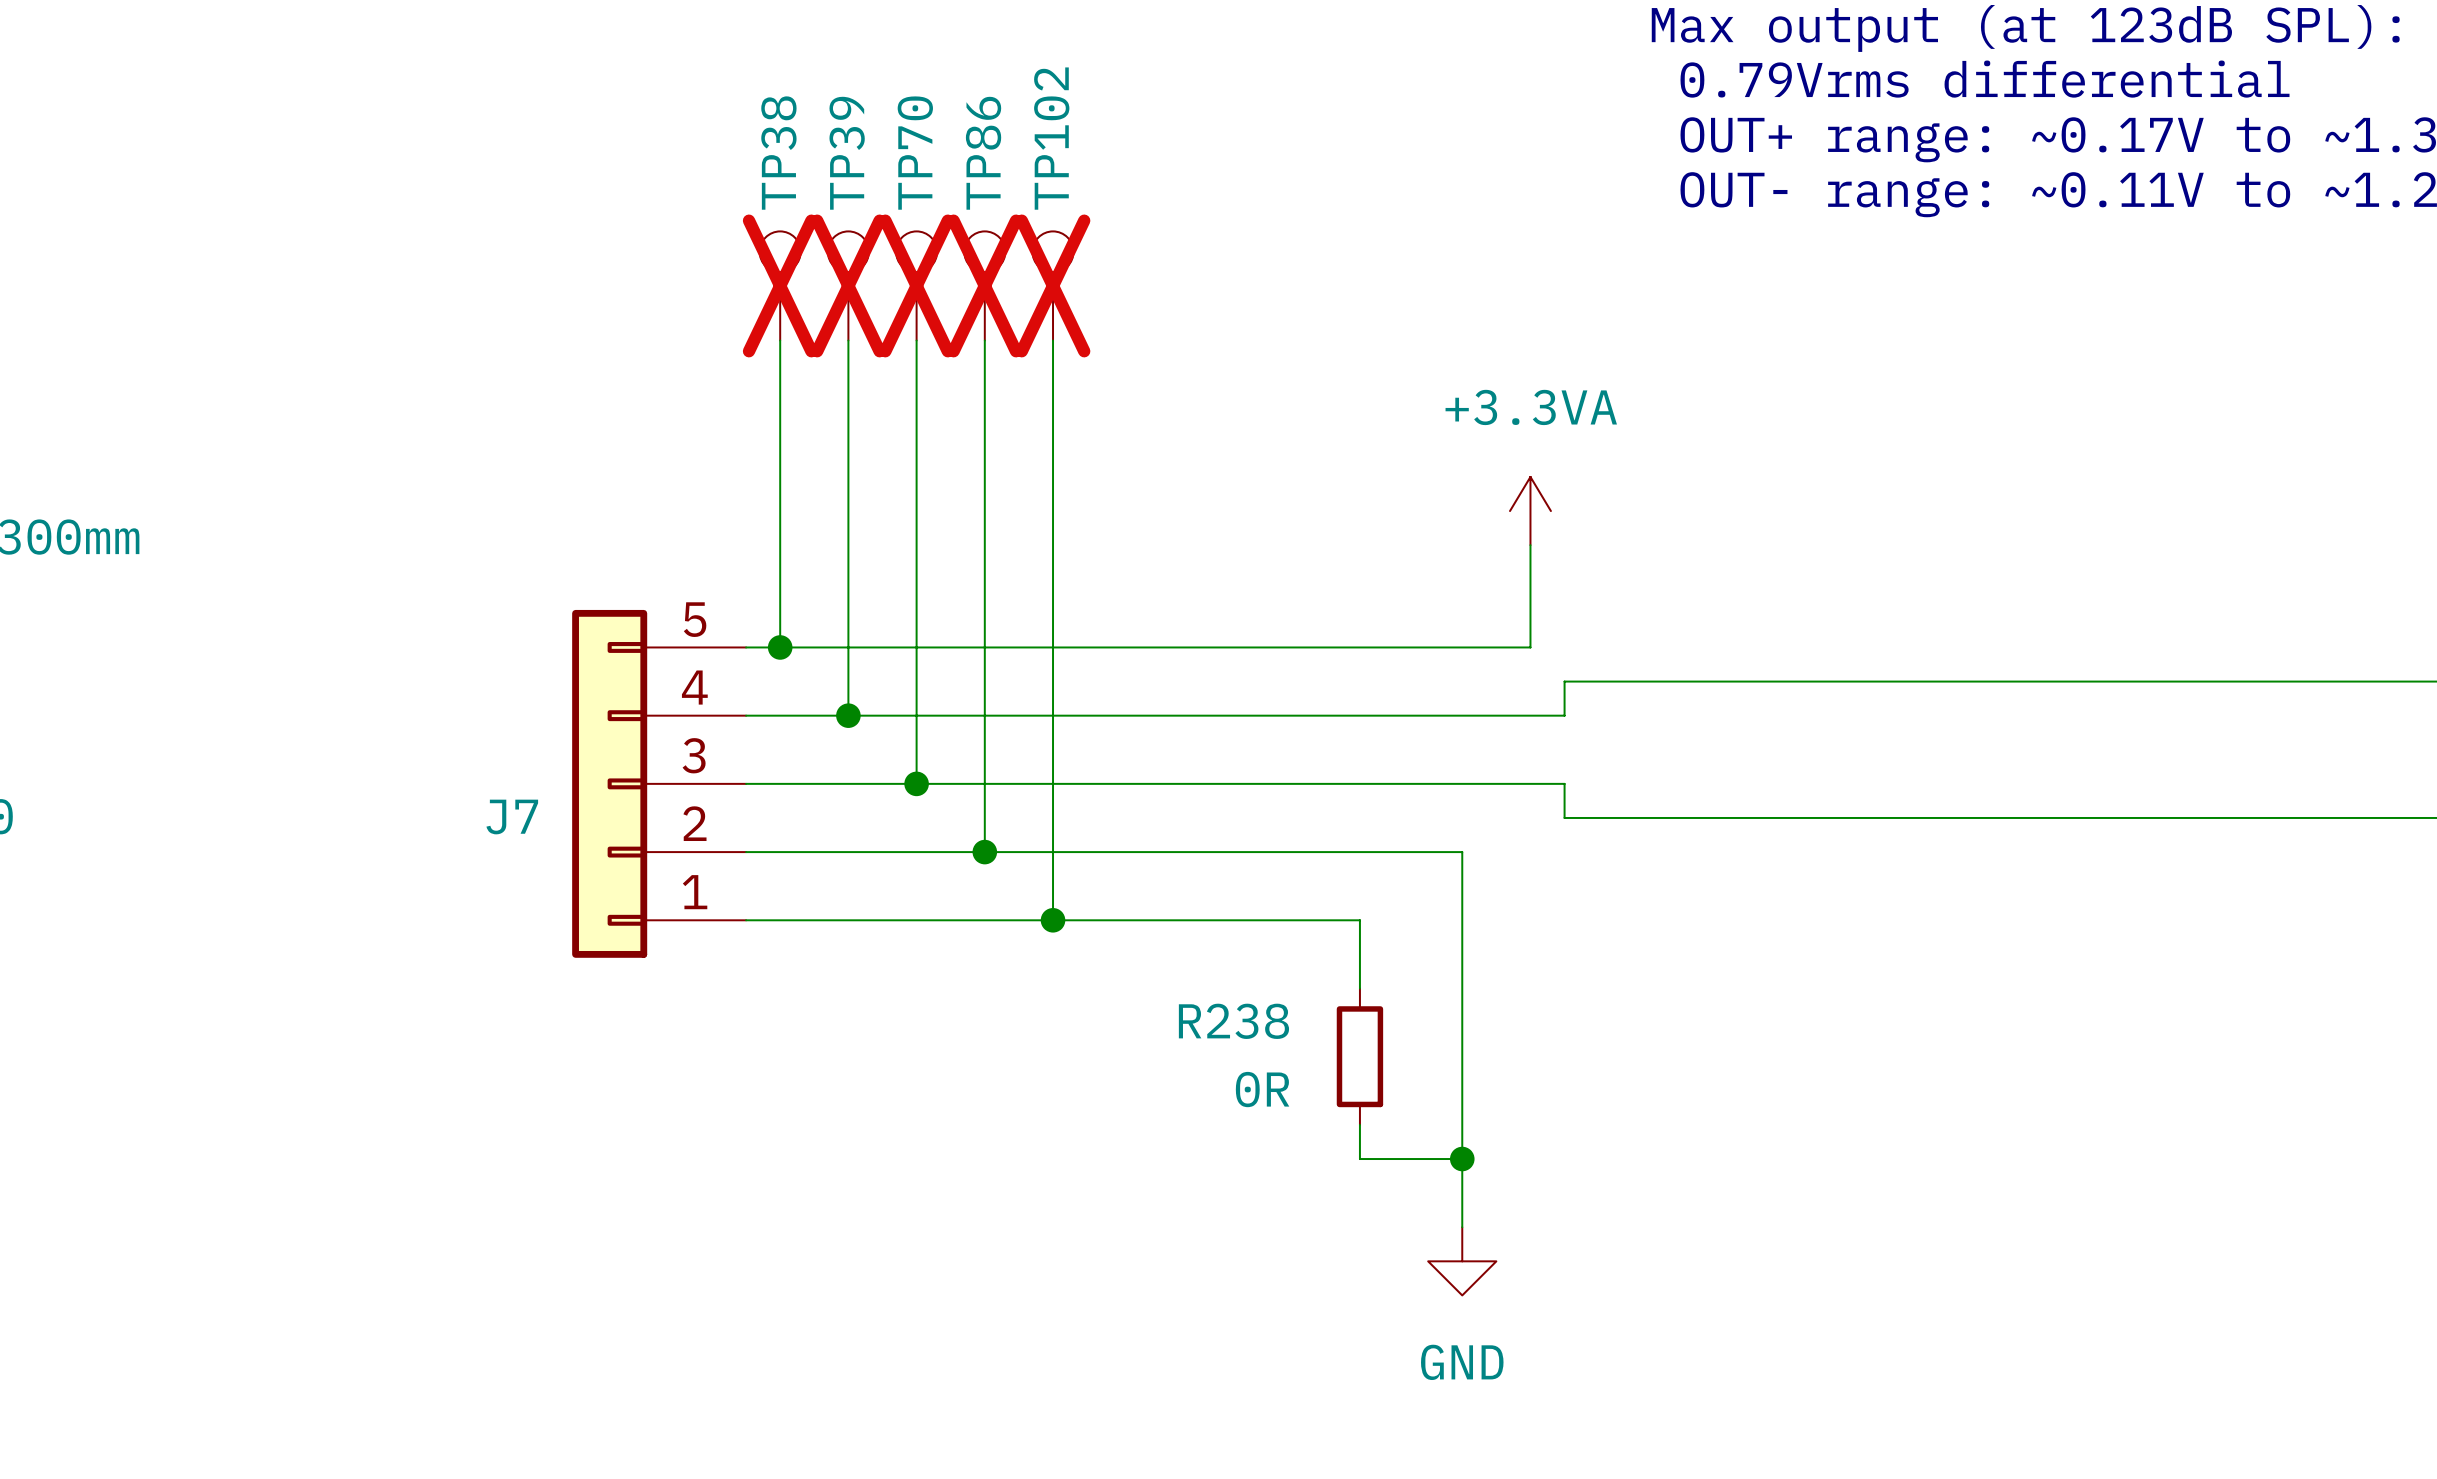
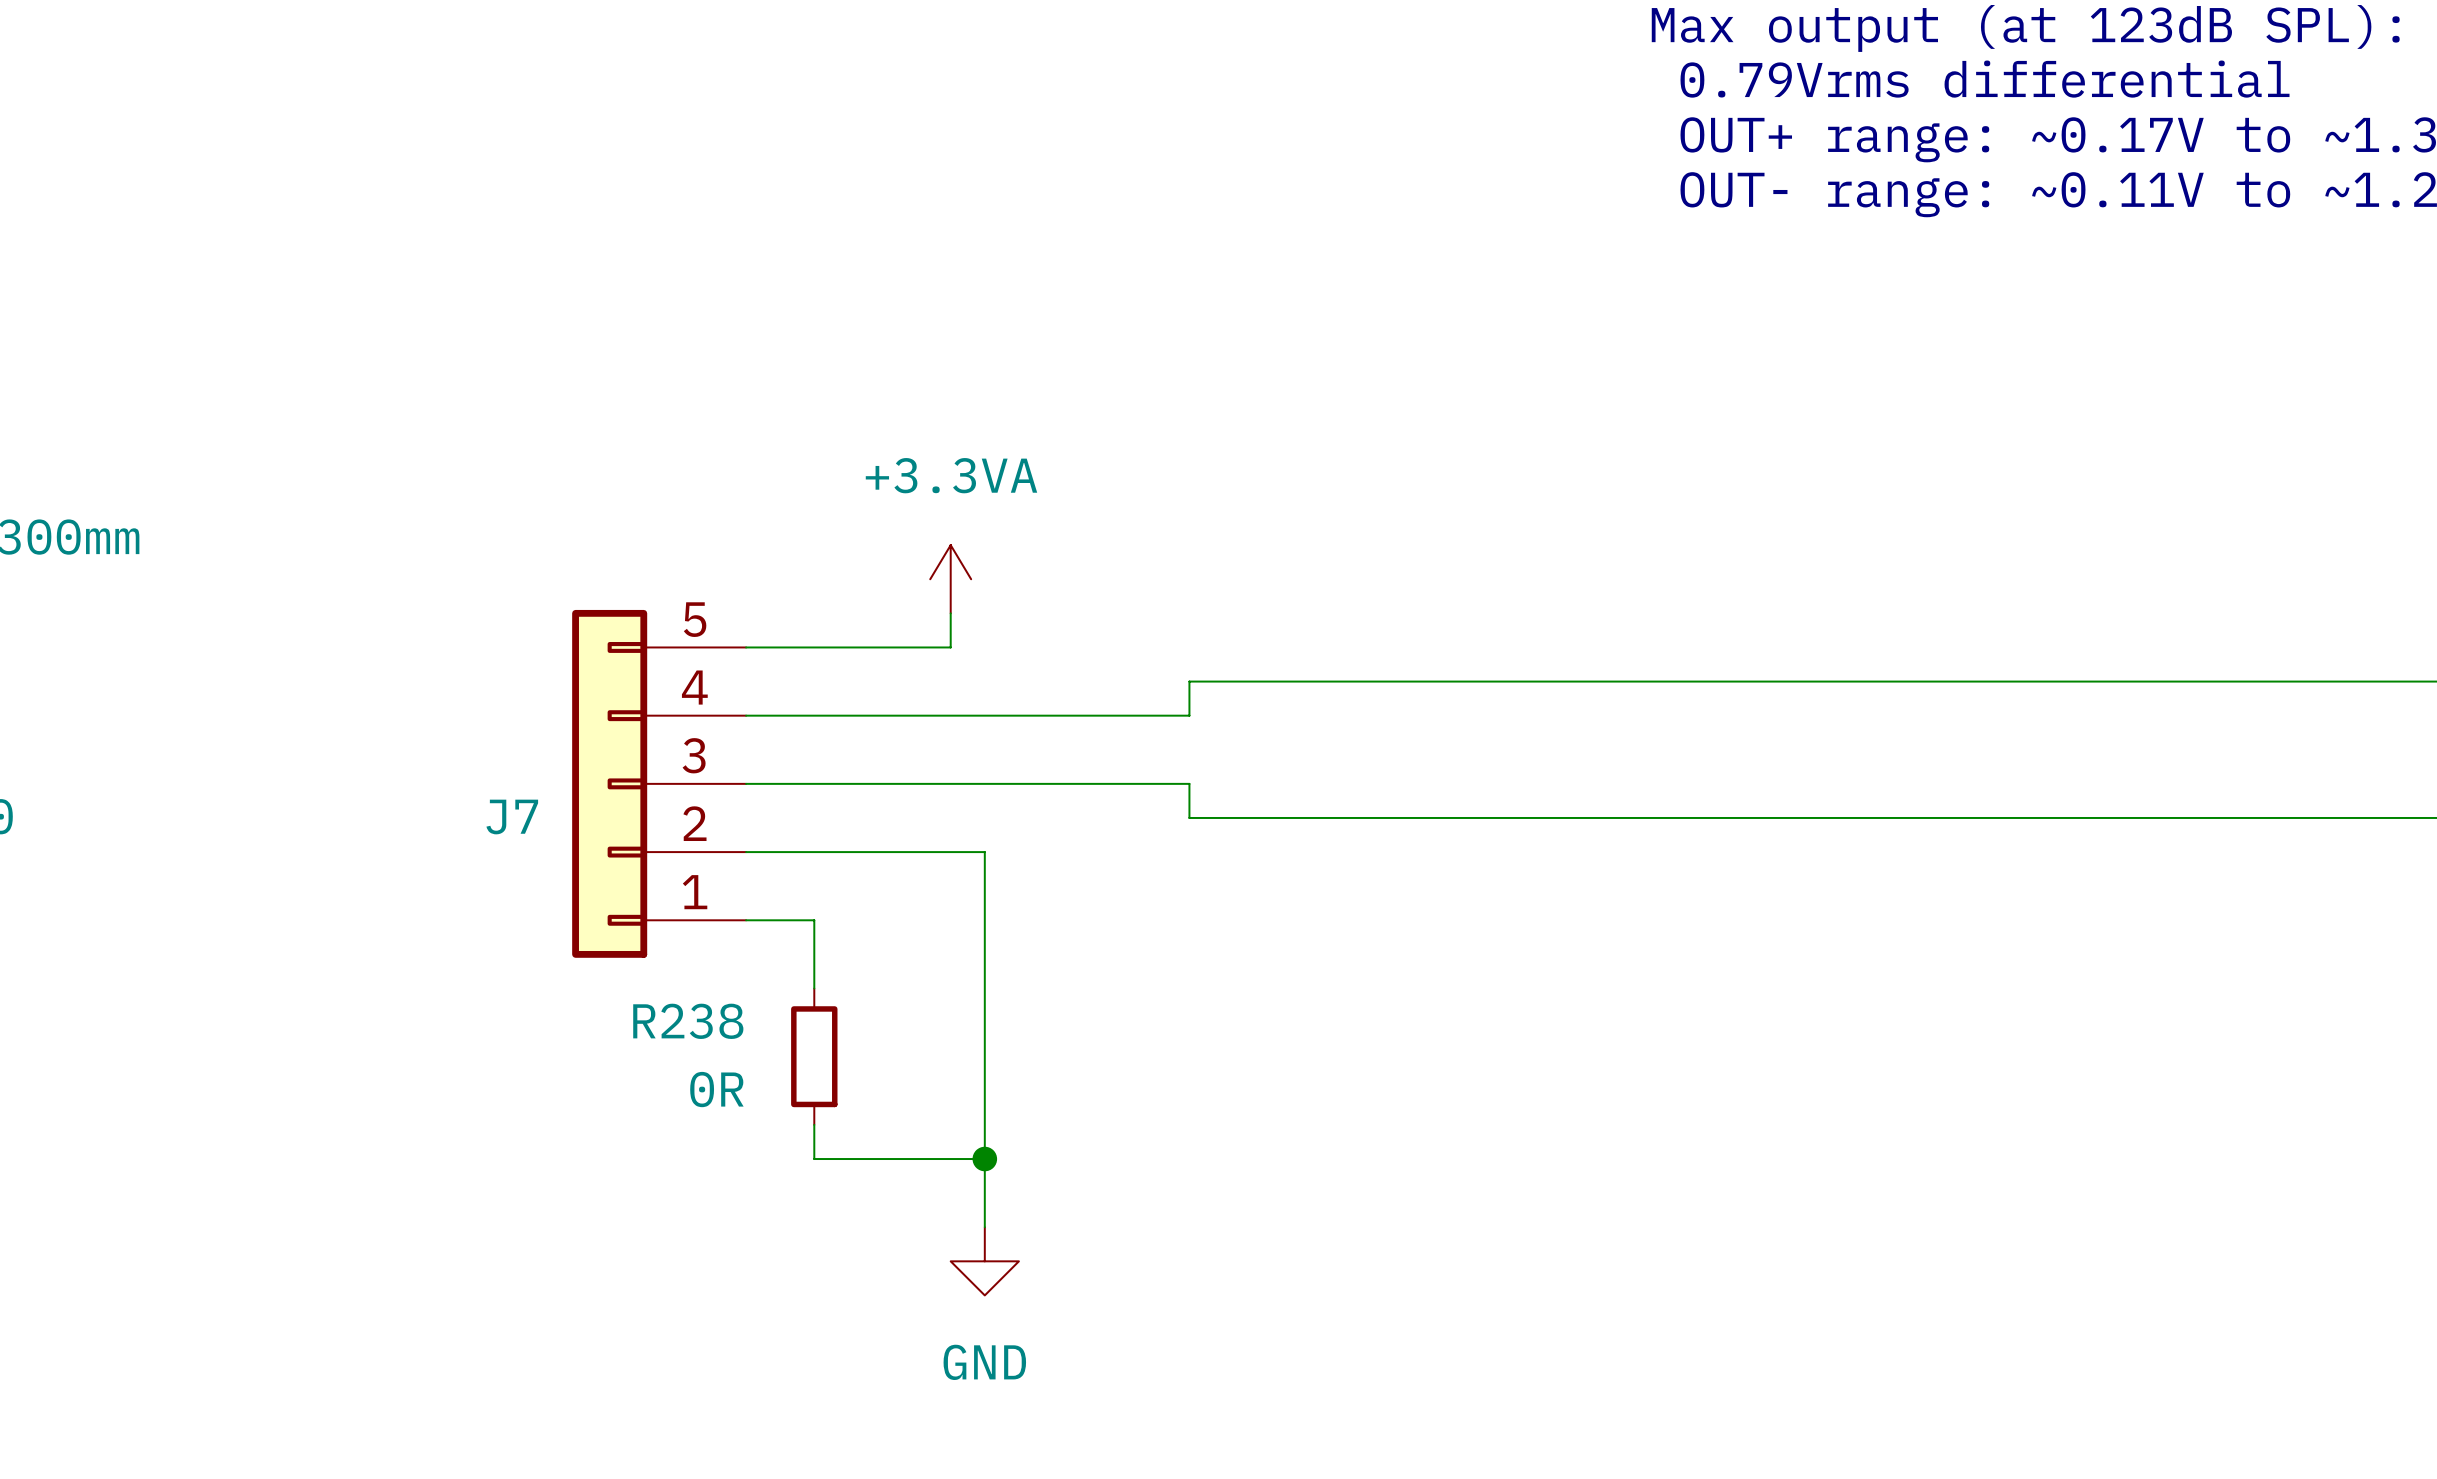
TP38: (780, 285) -> none
TP39: (848, 285) -> none
TP70: (916, 285) -> none
TP86: (984, 285) -> none
TP102: (1053, 285) -> none
wire: (780, 340) (780, 647) -> none
wire: (848, 340) (848, 715) -> (984, 852) (984, 1227)
wire: (916, 340) (916, 783) -> none
wire: (984, 340) (984, 852) (1462, 852) (1462, 1227) -> none
wire: (1053, 340) (1053, 920) -> none
power symbol position: +3.3VA (1530, 511) -> +3.3VA (950, 579)
wire: (1530, 545) (1530, 647) (950, 647) -> (950, 613) (950, 647)
junction: (780, 647) -> none
wire: (1564, 681) (1564, 715) (1189, 715) -> (1564, 681) (1189, 681) (1189, 715)
junction: (848, 715) -> none
junction: (916, 783) -> none
wire: (1189, 783) (1564, 783) (1564, 817) -> (1189, 783) (1189, 817) (1564, 817)
junction: (984, 852) -> none
wire: (814, 920) (1359, 920) (1359, 988) -> (814, 920) (814, 988)
junction: (1053, 920) -> none
R238 position: (1359, 1056) -> (814, 1056)
wire: none -> (814, 1124) (814, 1159) (984, 1159)
wire: (1359, 1124) (1359, 1159) (1462, 1159) -> none
junction: none -> (984, 1159)
junction: (1462, 1159) -> none
power symbol position: GND (1462, 1261) -> GND (984, 1261)

